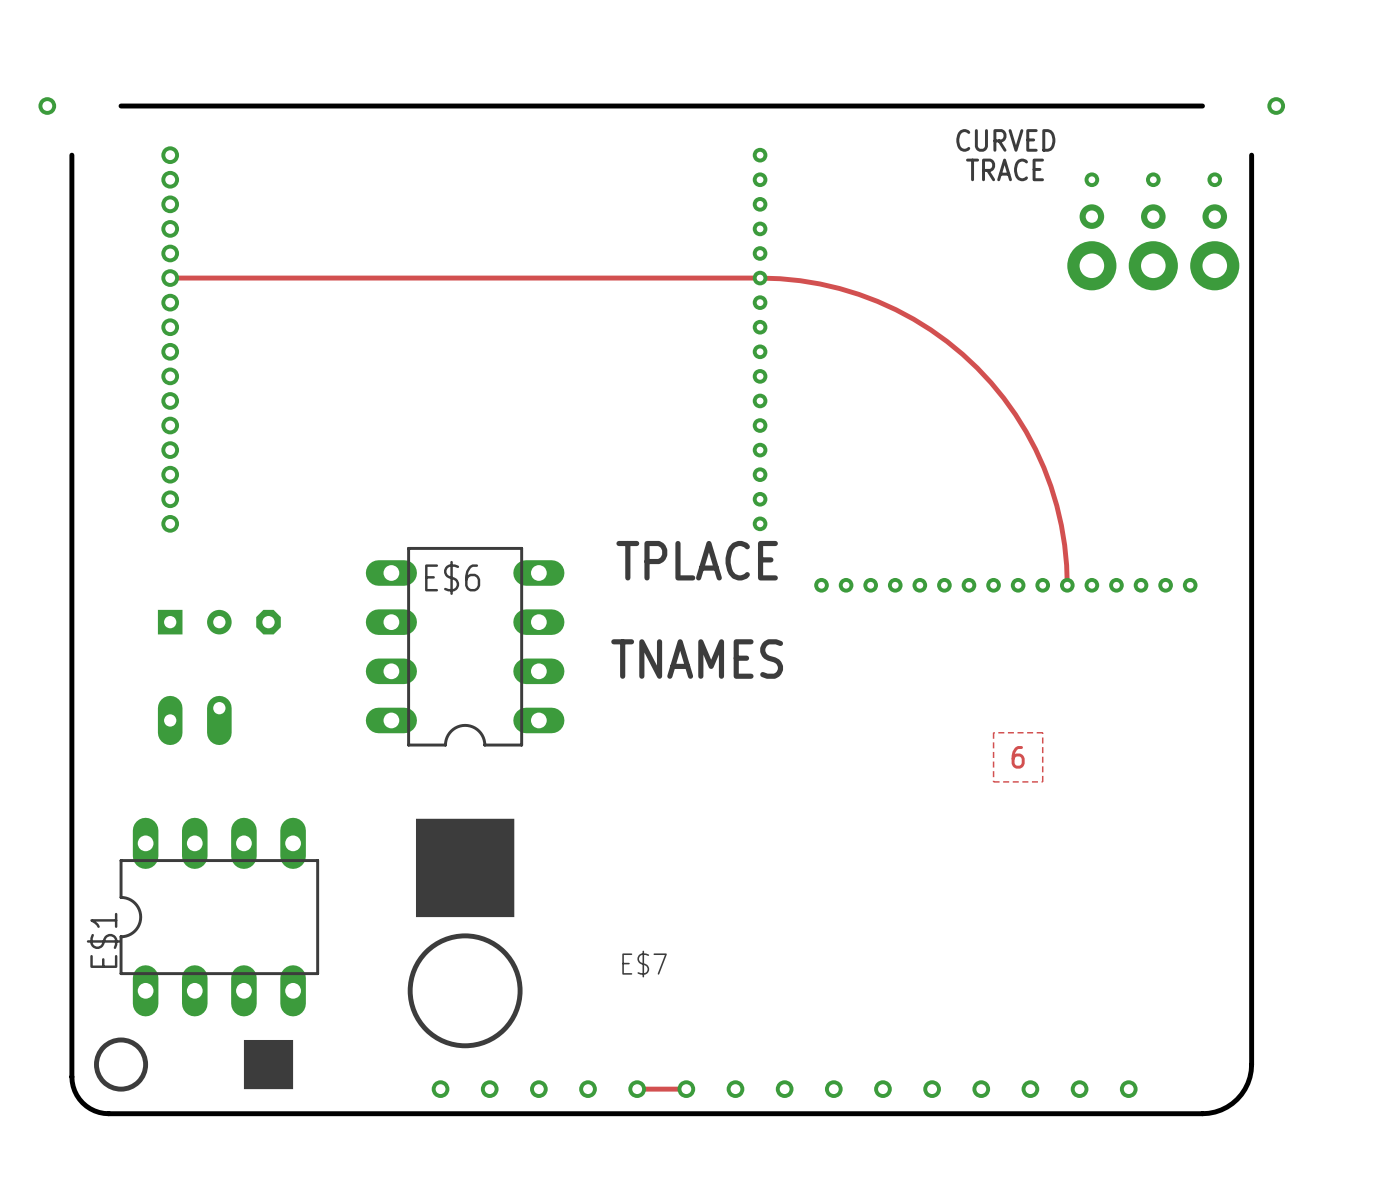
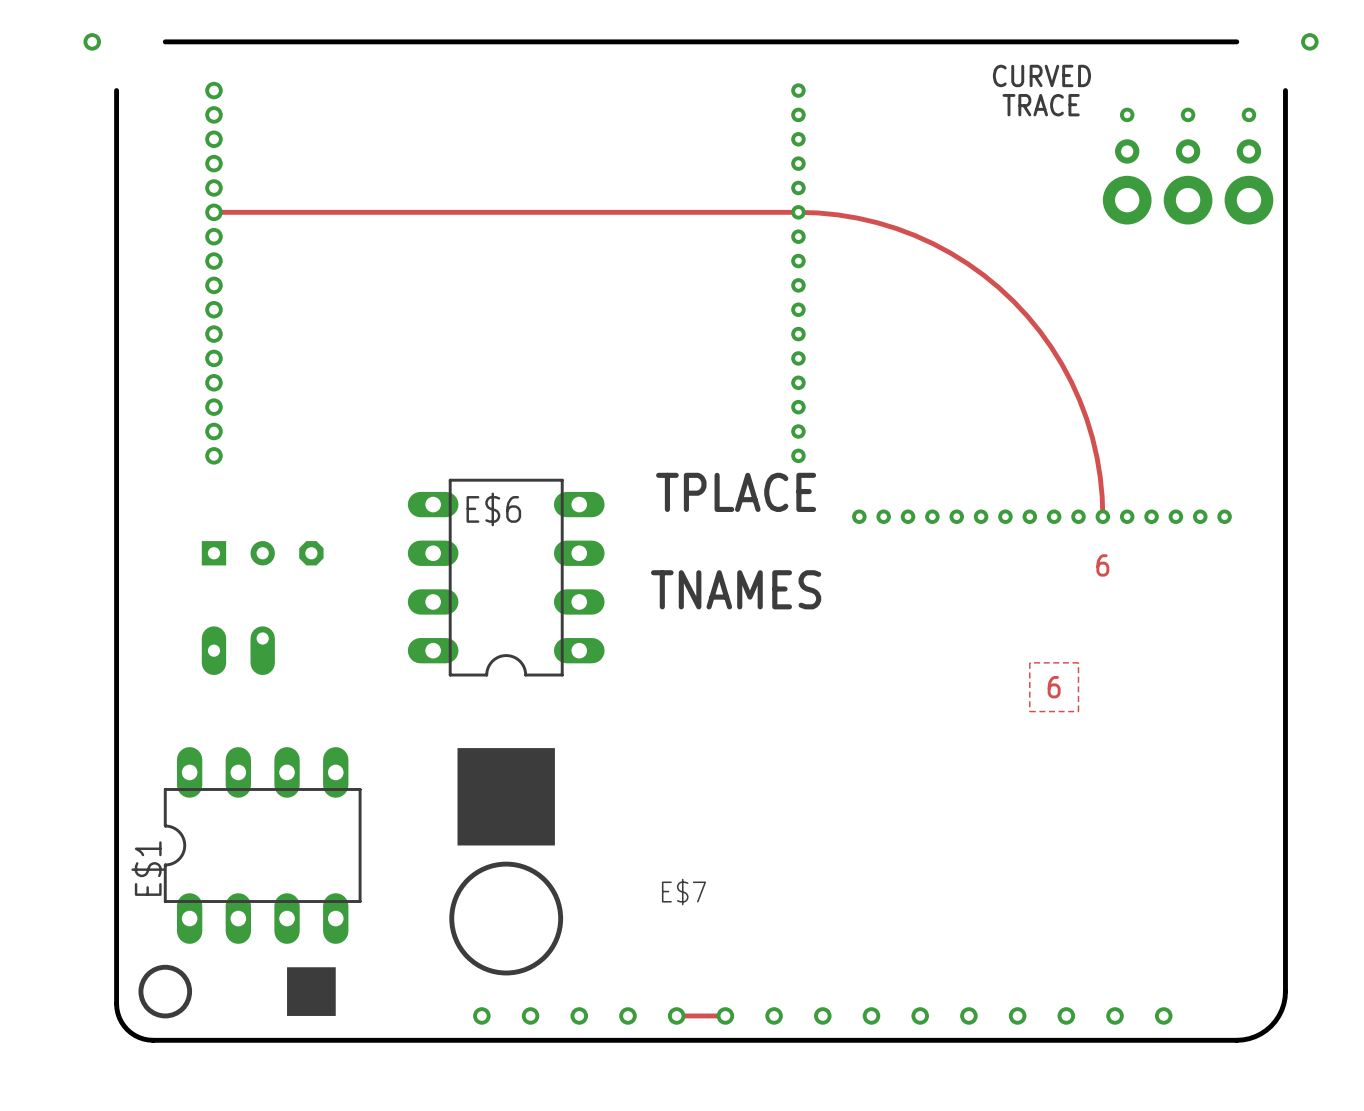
text: none -> 6 (1102, 565)

